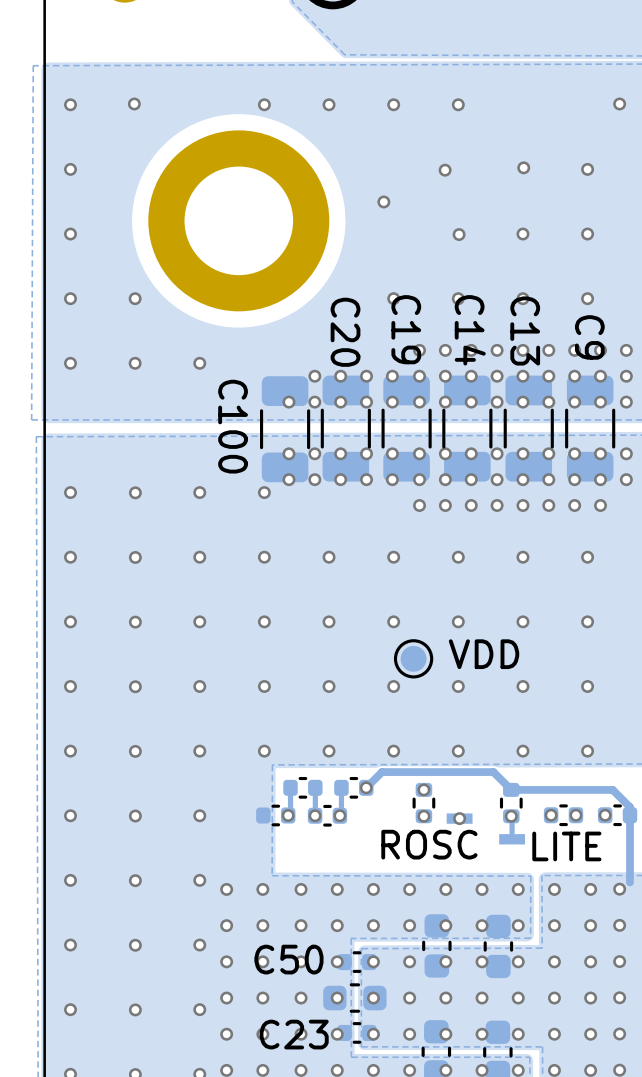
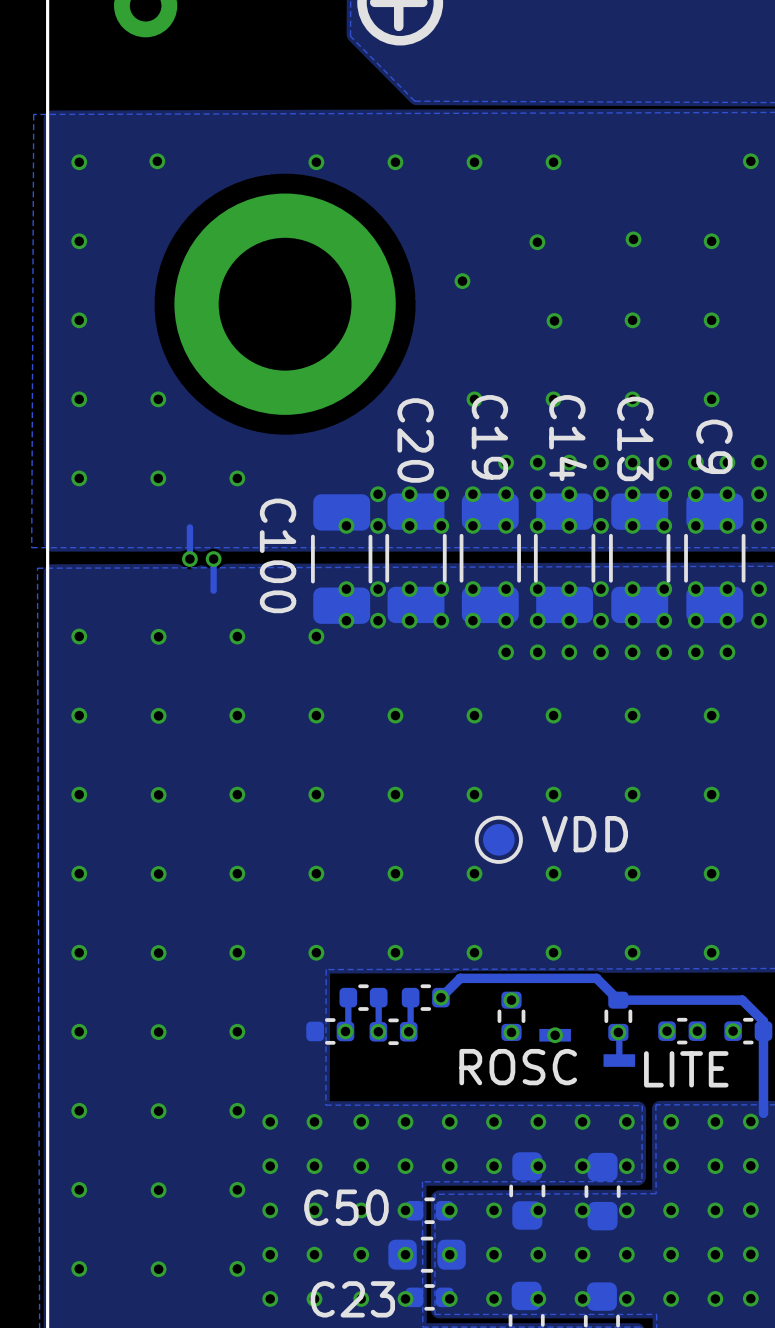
part: none -> (189, 543)
via: none -> (189, 559)
via: none -> (213, 559)
part: none -> (213, 574)

